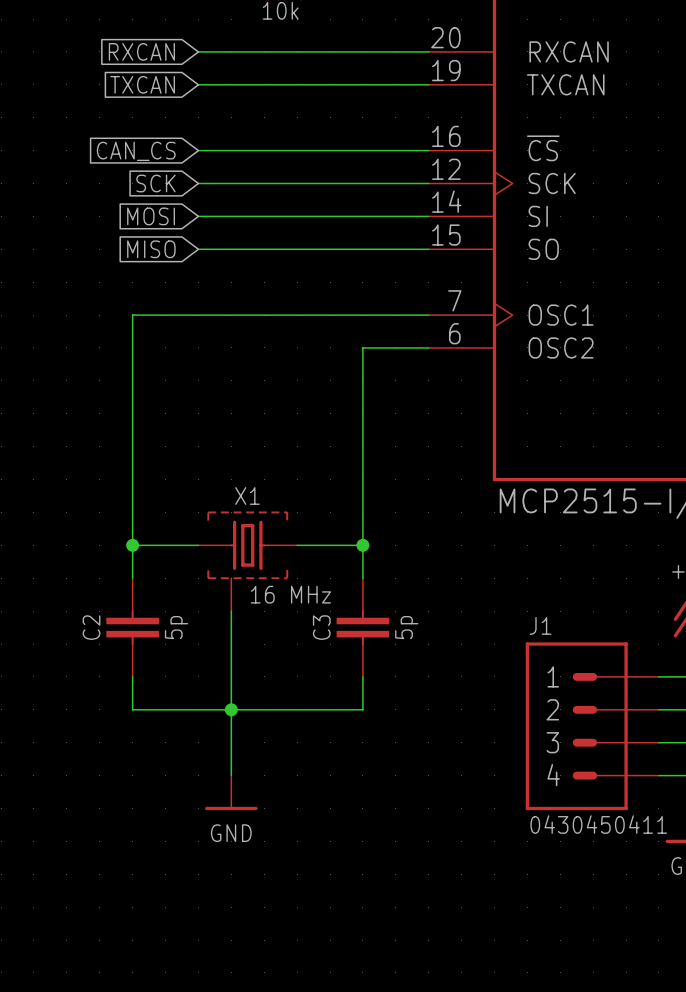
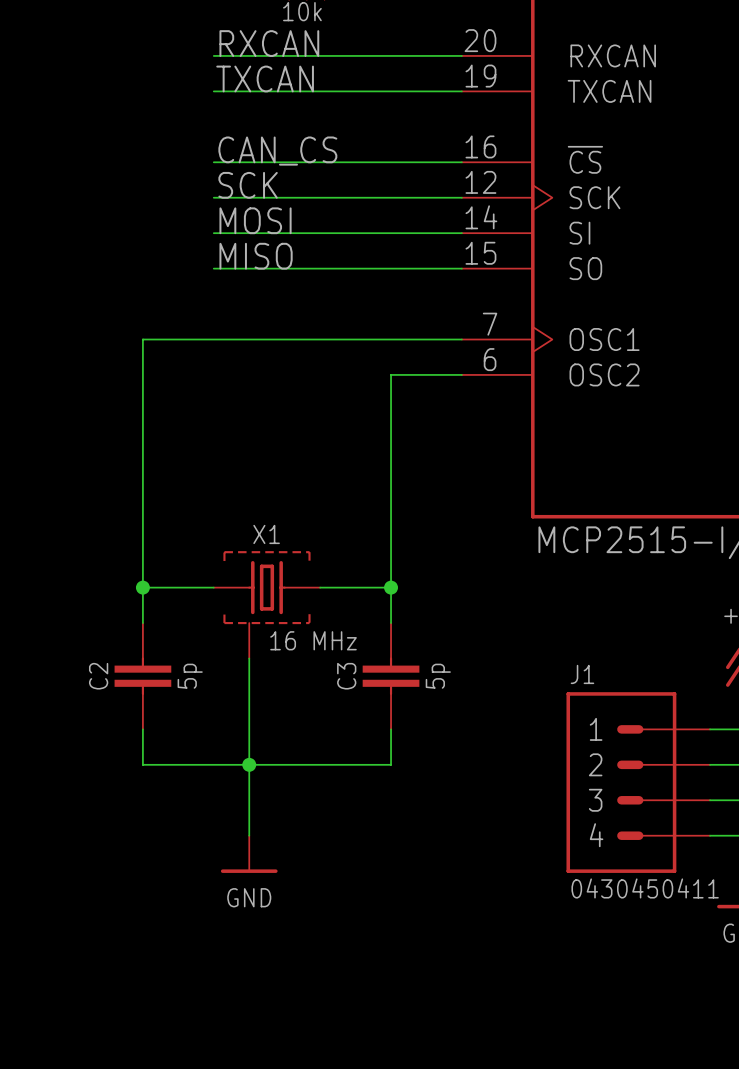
label: none -> RXCAN (269, 43)
global label: RXCAN (141, 51) -> none
label: none -> TXCAN (265, 78)
global label: TXCAN (142, 84) -> none
label: none -> CAN_CS (277, 151)
global label: CAN_CS (136, 151) -> none
label: none -> SCK (248, 185)
global label: SCK (155, 183) -> none
label: none -> MOSI (255, 220)
global label: MOSI (151, 216) -> none
label: none -> MISO (256, 256)
global label: MISO (151, 249) -> none

